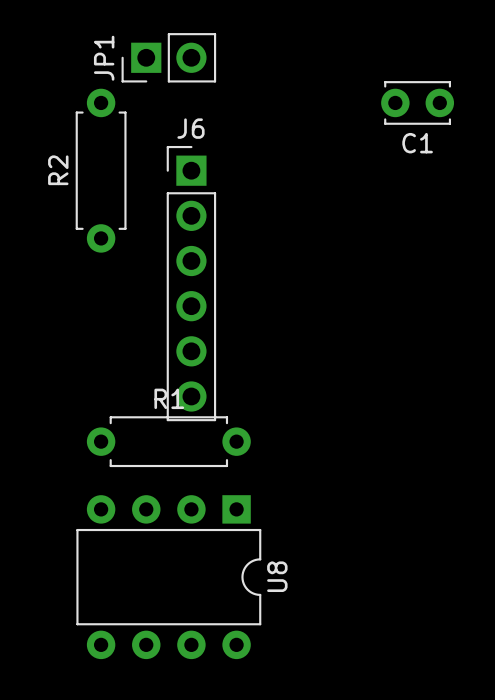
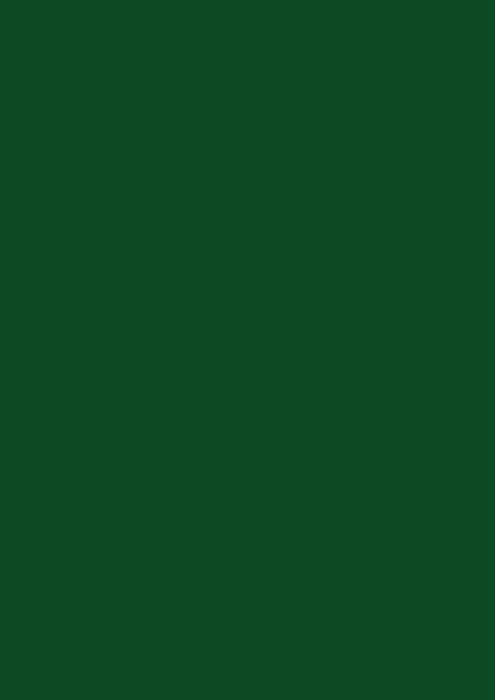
JP1: (168, 57) -> none
C1: (417, 102) -> none
R2: (101, 170) -> none
J6: (191, 283) -> none
R1: (168, 441) -> none
U8: (168, 577) -> none

